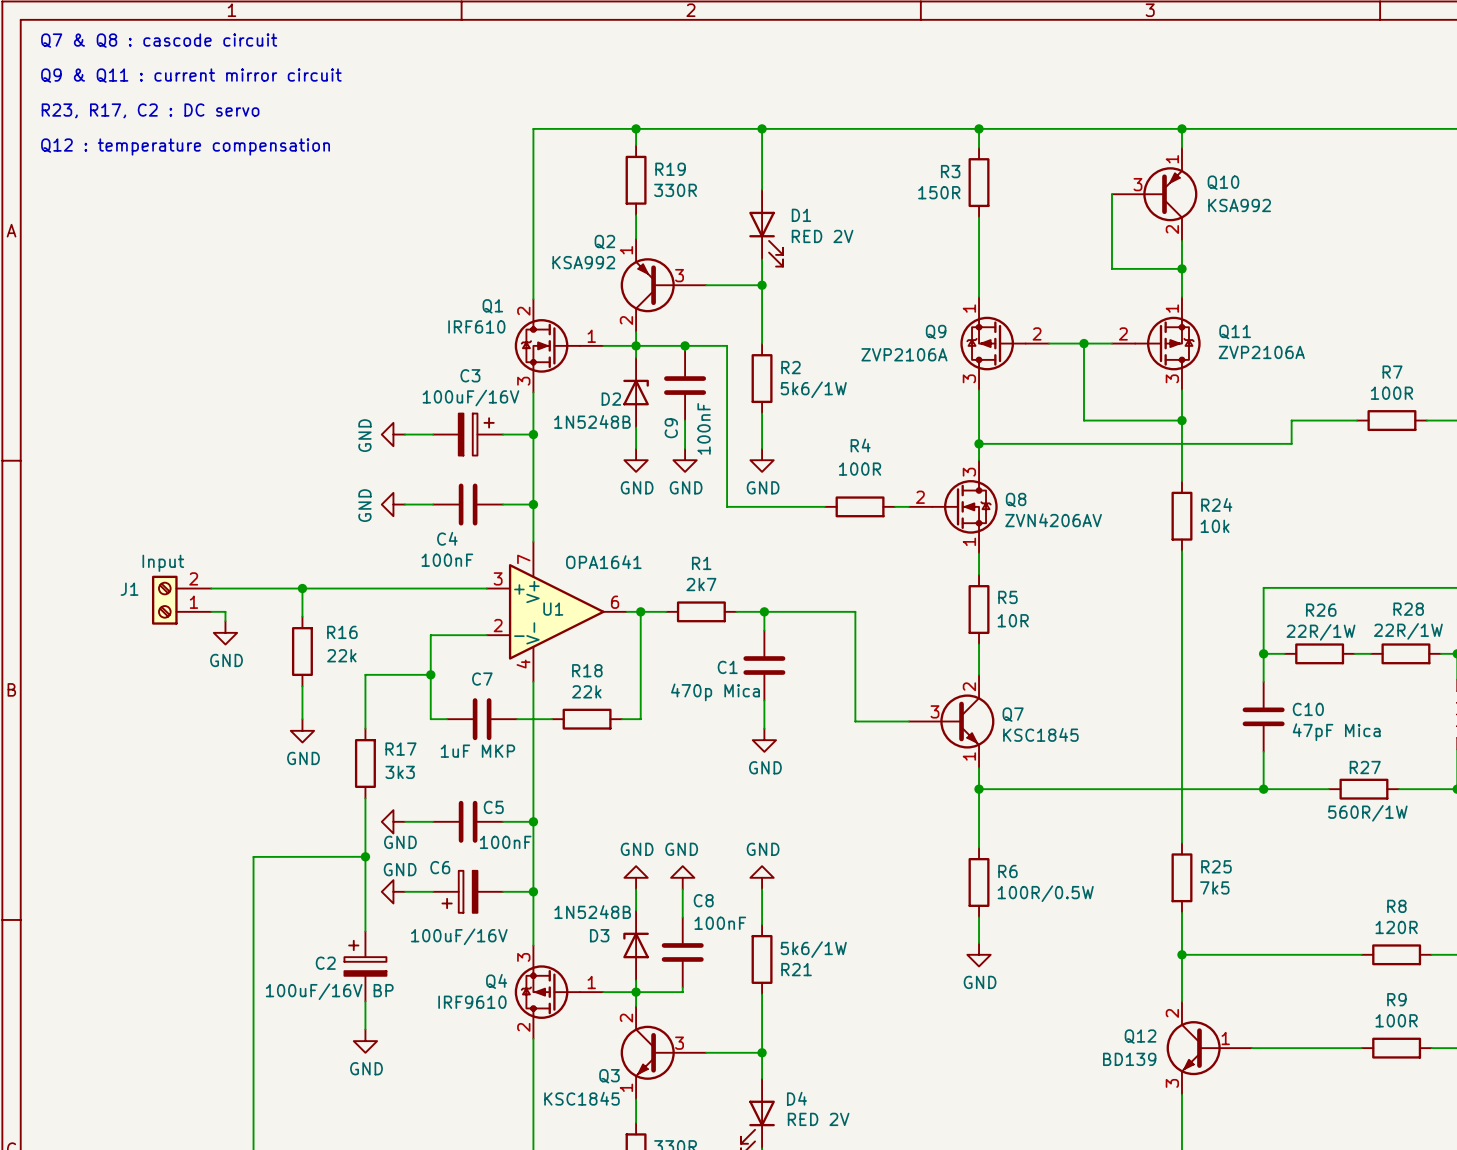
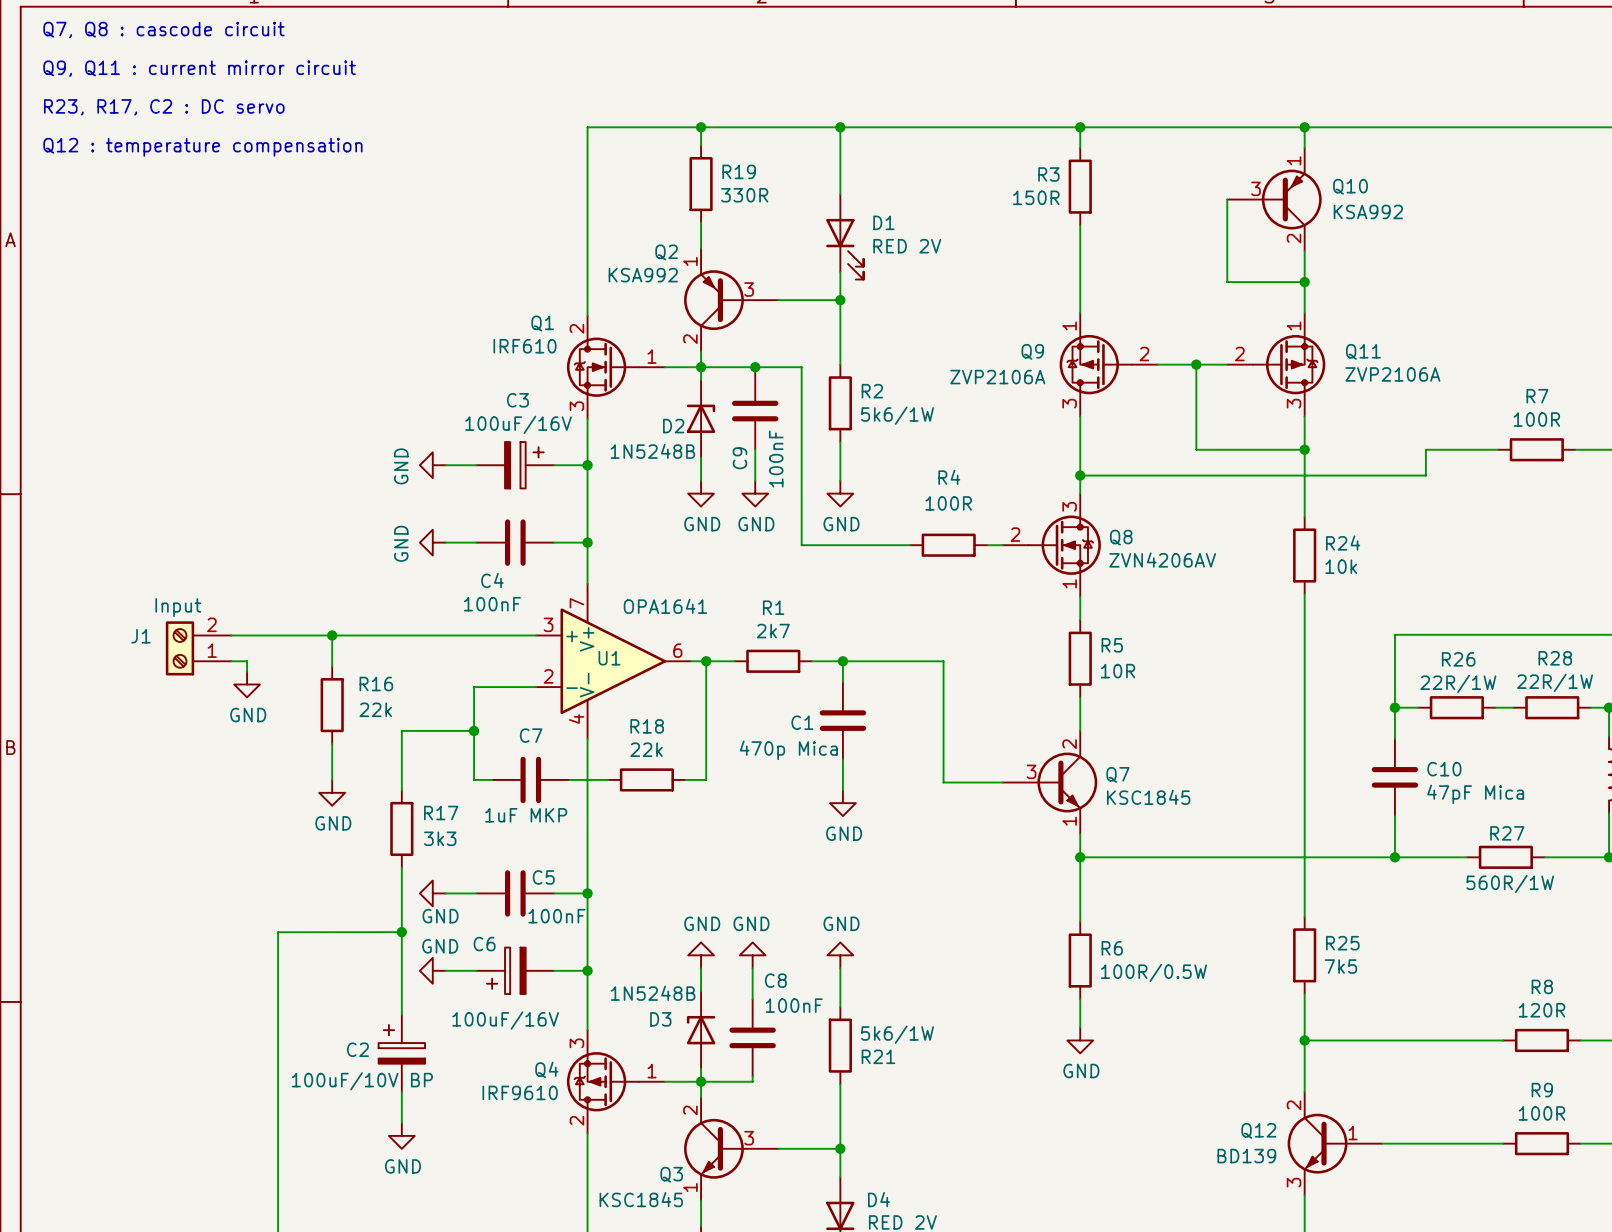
text: Q7 & Q8 : cascode circuit (159, 40) -> Q7, Q8 : cascode circuit (163, 29)
text: Q9 & Q11 : current mirror circuit (191, 75) -> Q9, Q11 : current mirror circuit (199, 68)
C2 value: 100uF/16V BP (329, 991) -> 100uF/10V BP (362, 1081)

